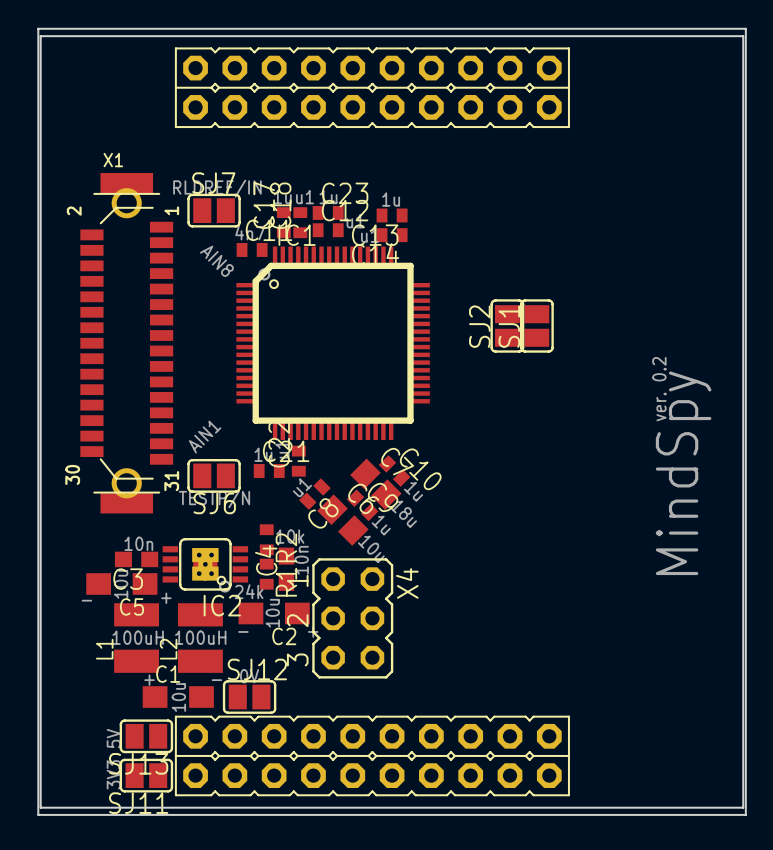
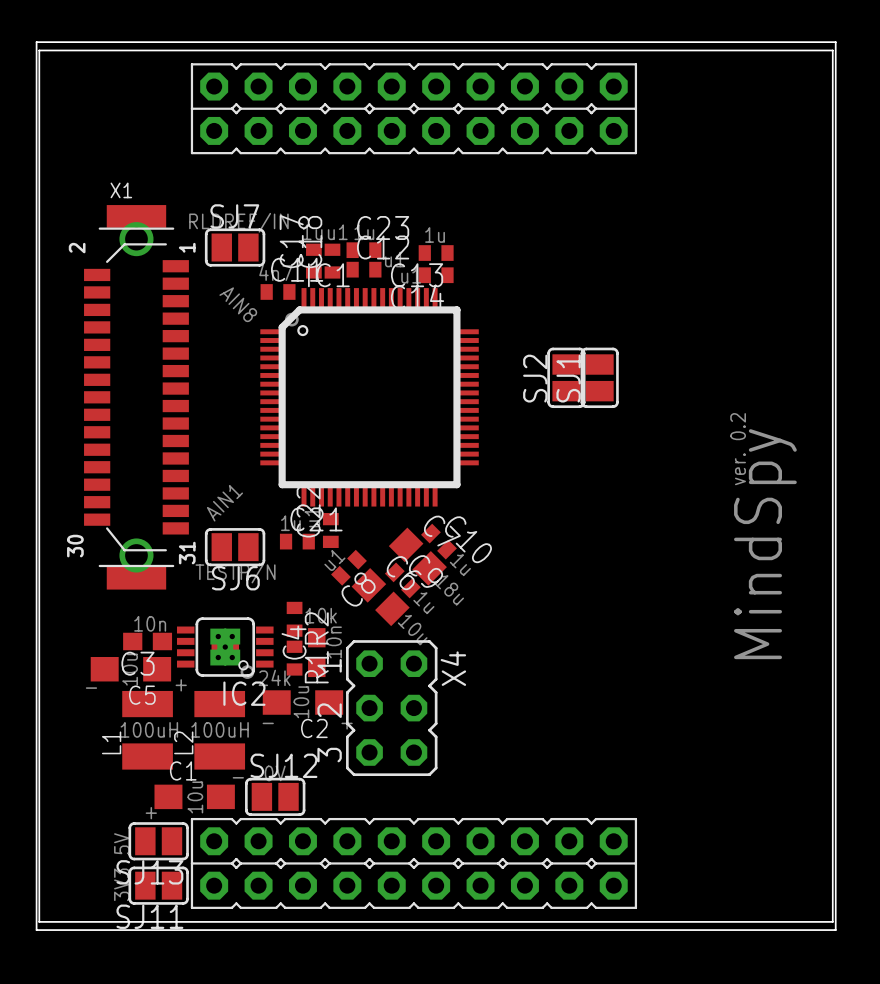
text position: + (149, 680) -> + (151, 813)

